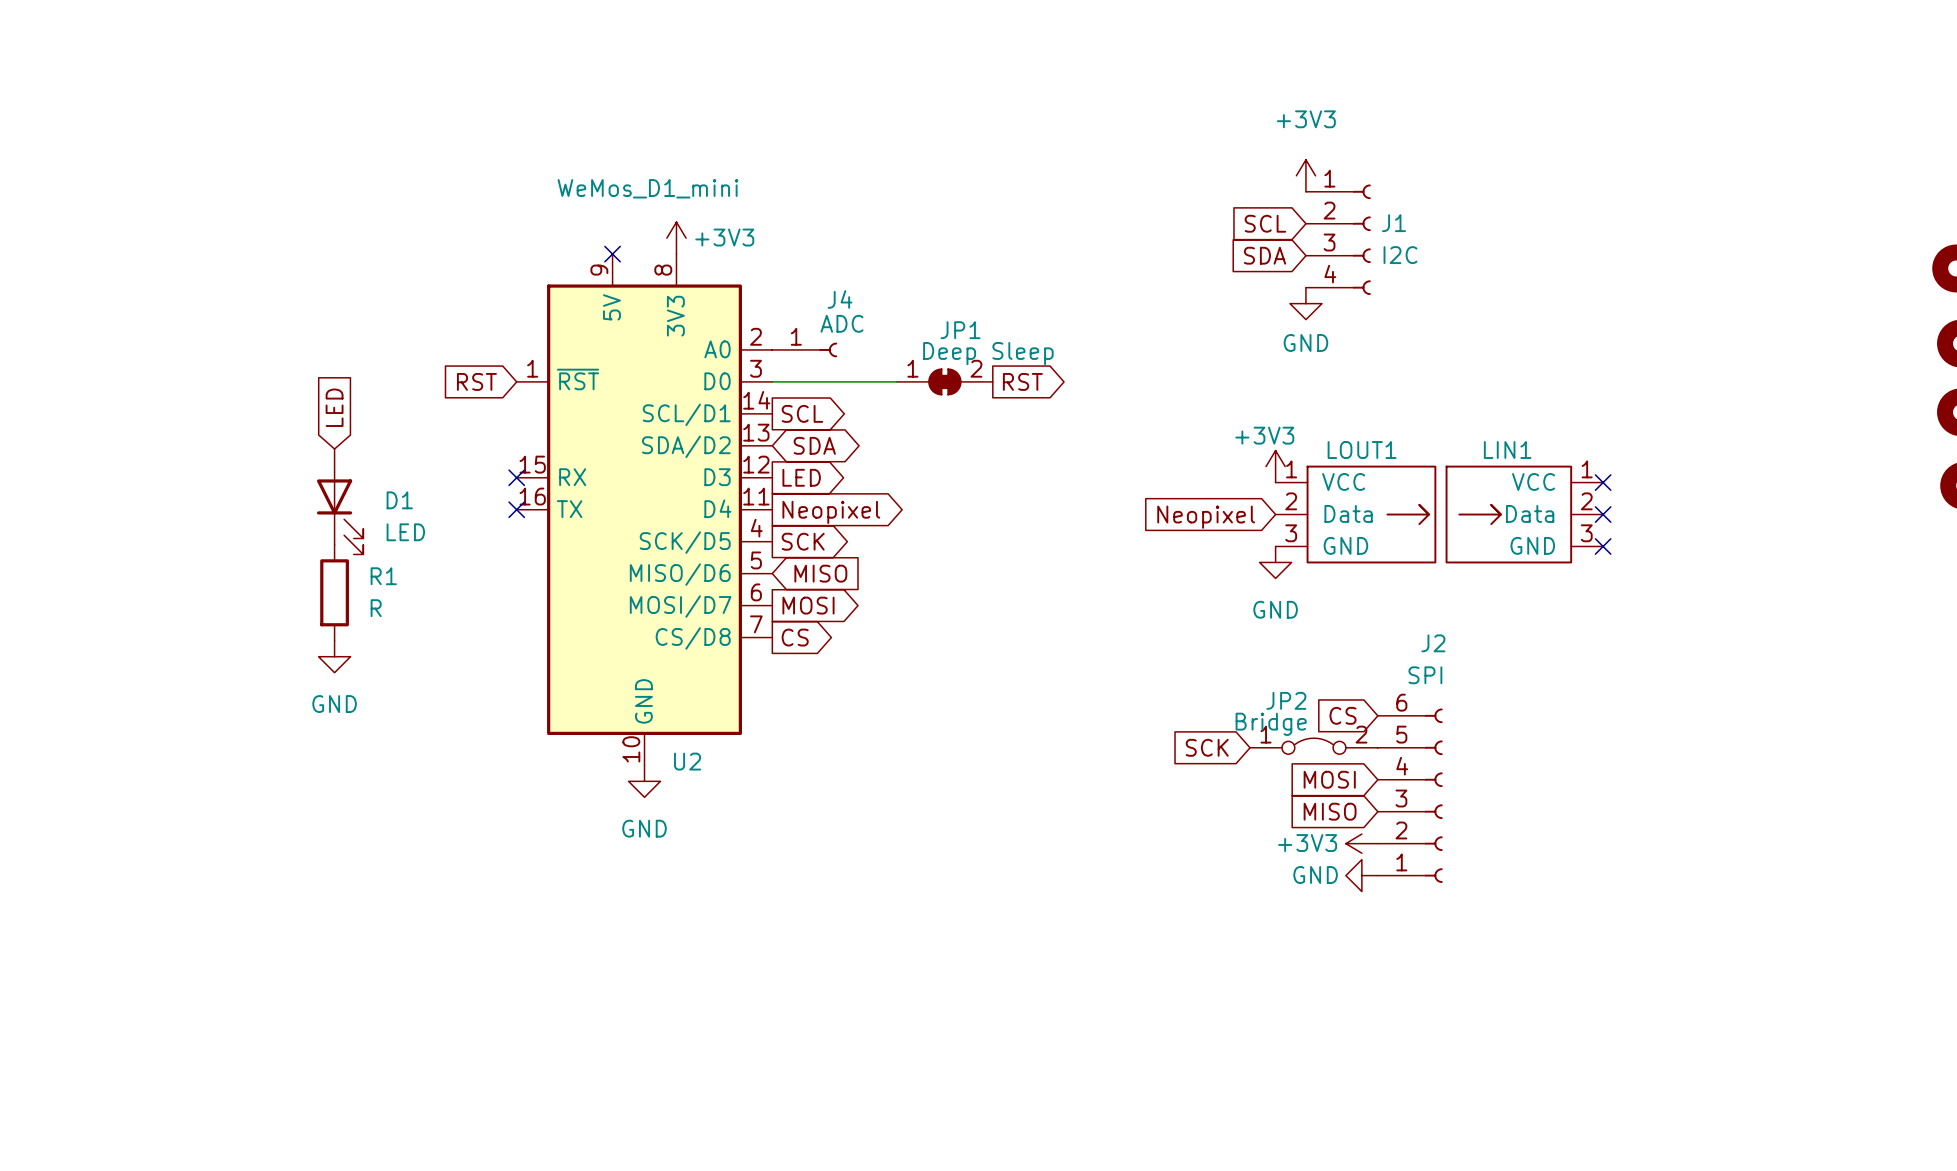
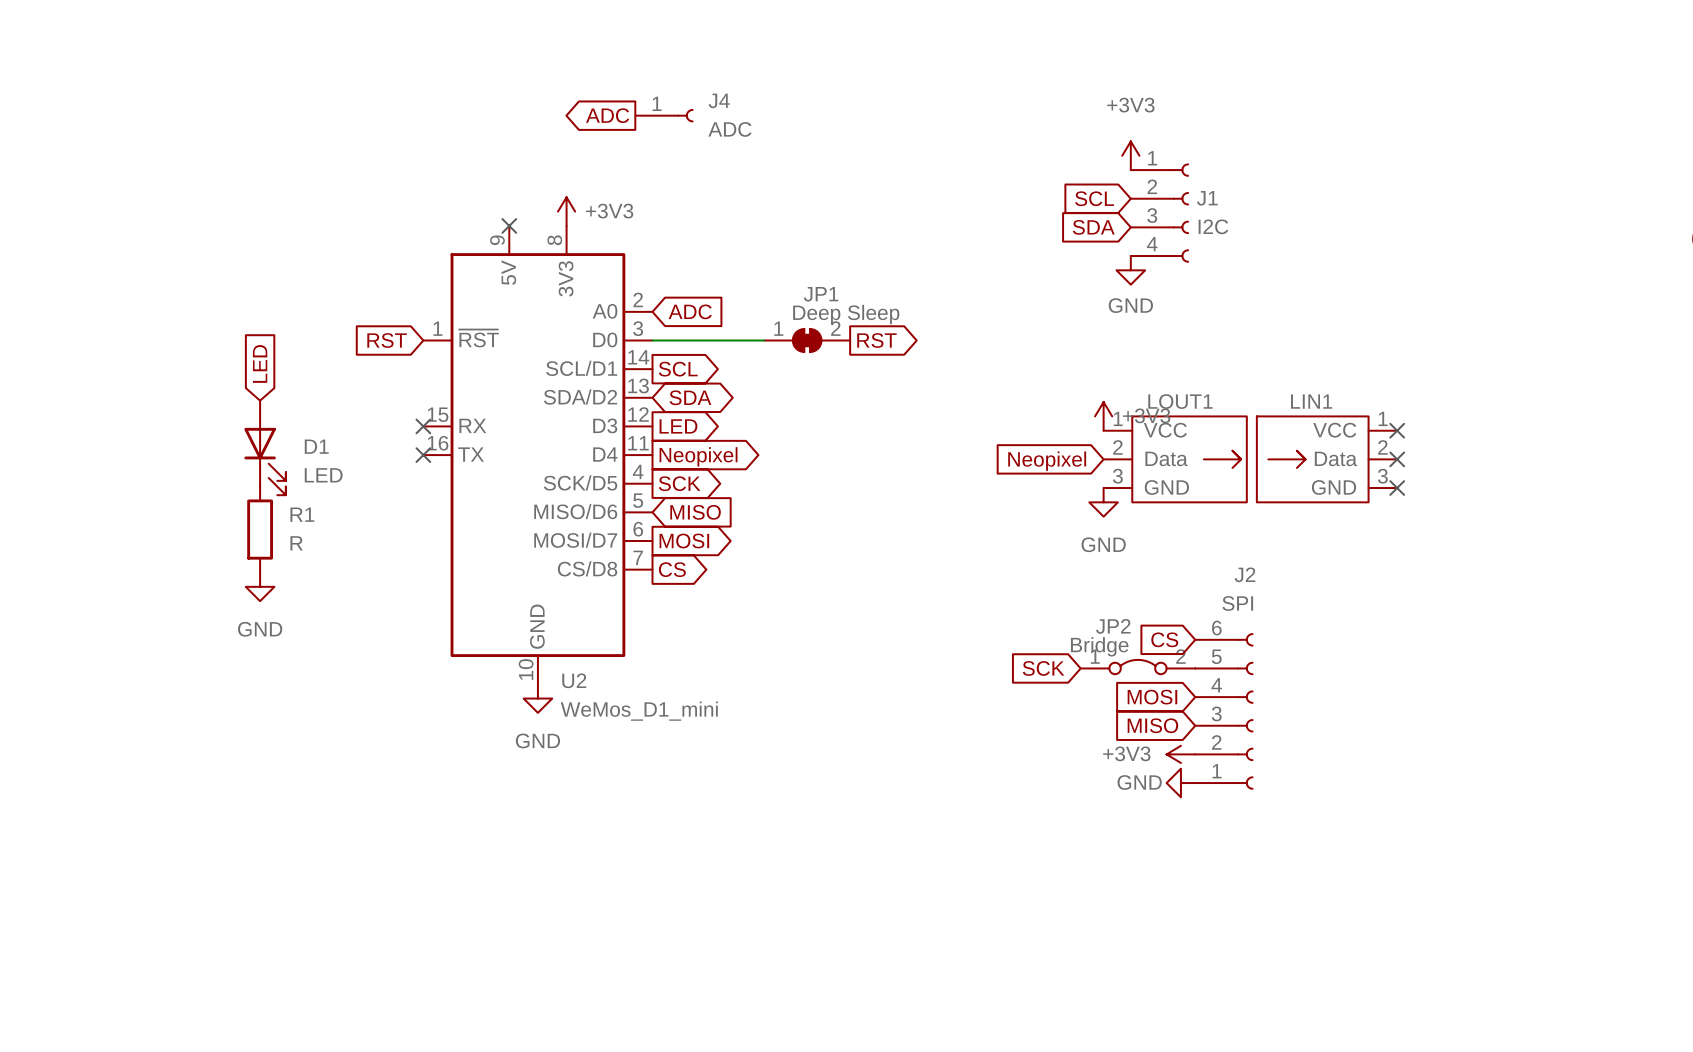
global label: none -> ADC (607, 115)
U2 value position: WeMos_D1_mini (647, 188) -> WeMos_D1_mini (639, 711)
J4 name position: J4 (840, 299) -> J4 (719, 100)
J4 value position: ADC (841, 323) -> ADC (729, 129)
J4 position: (804, 349) -> (664, 115)
global label: none -> ADC (690, 311)
power symbol text position: +3V3 (1264, 435) -> +3V3 (1146, 415)

